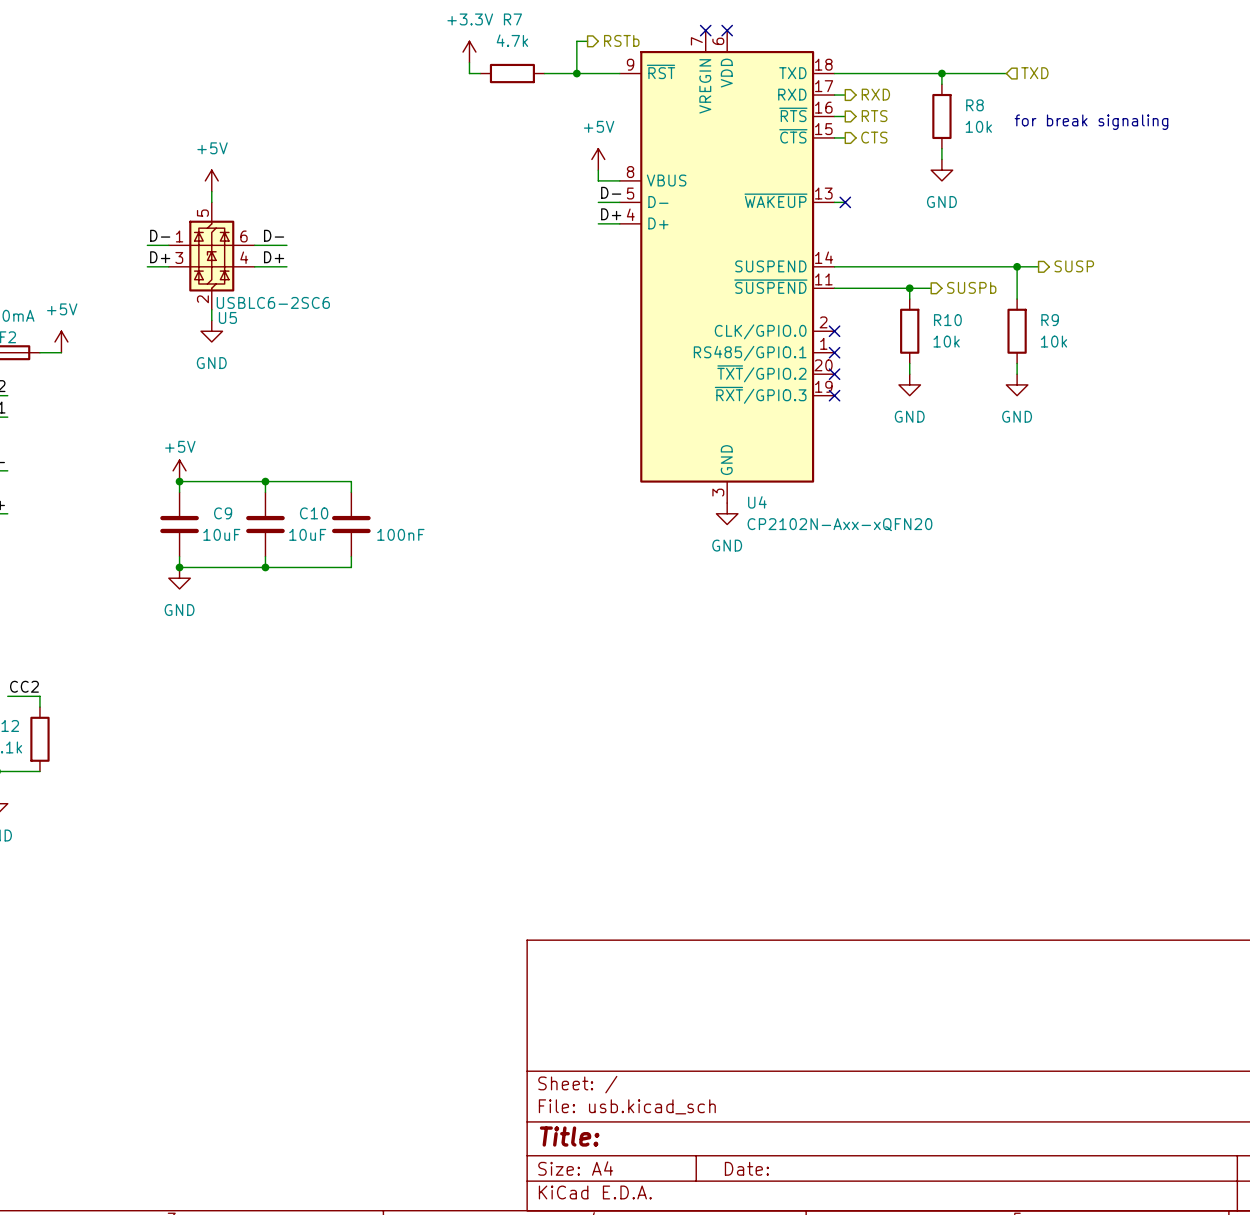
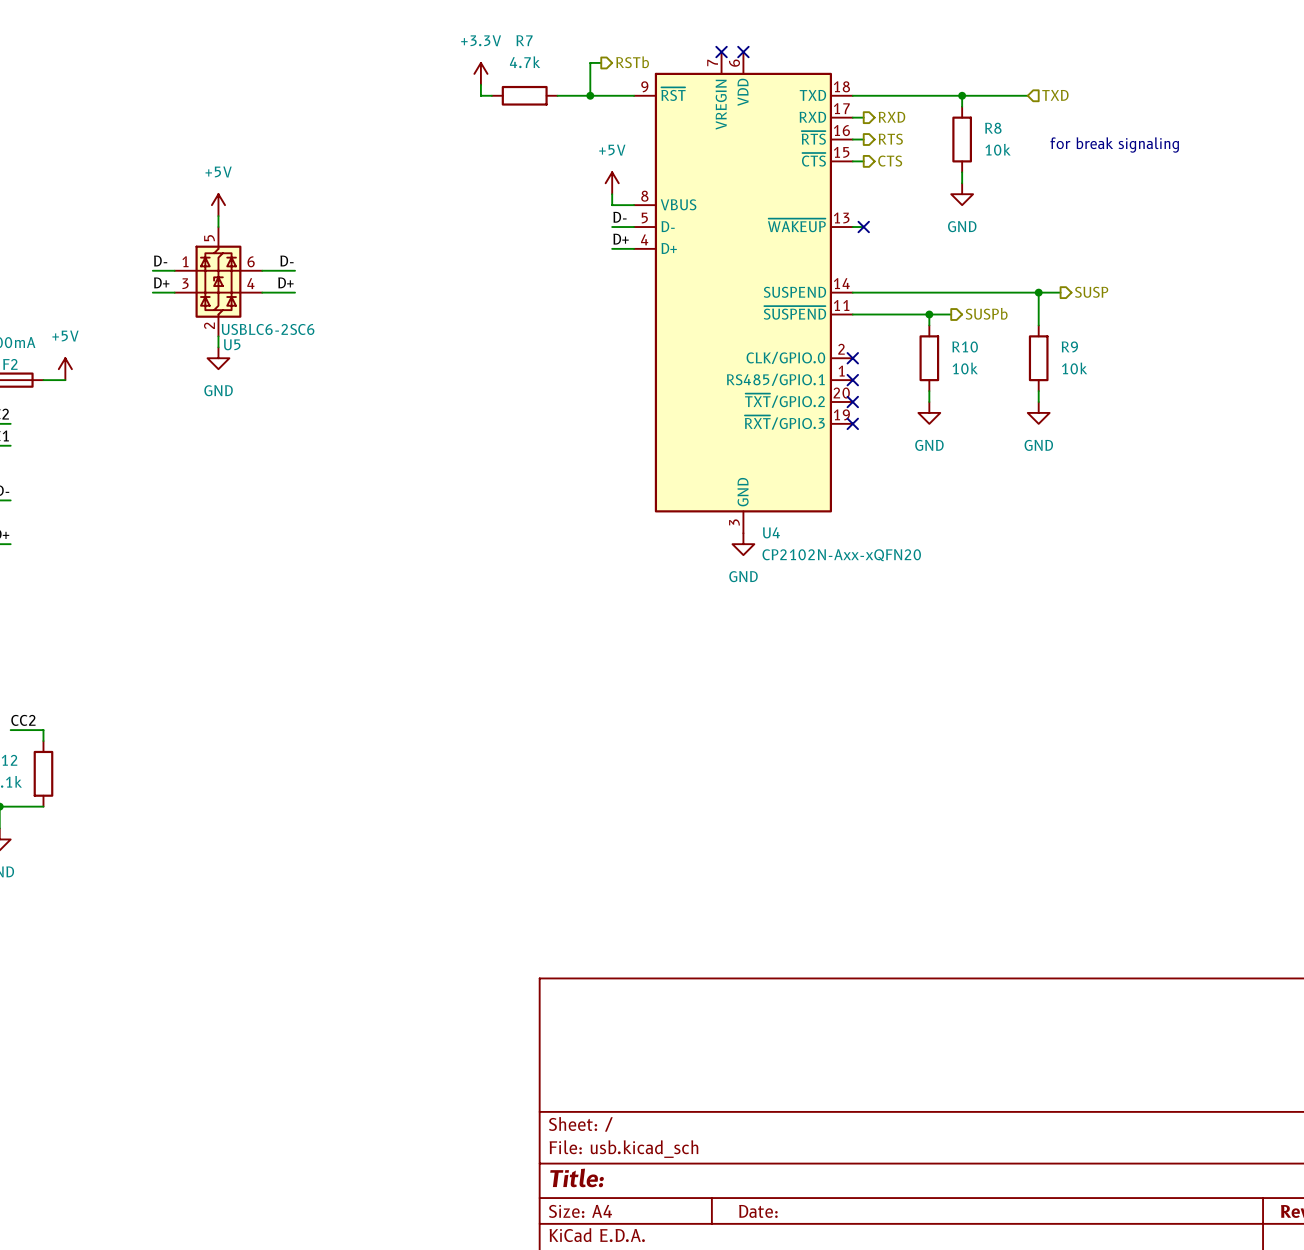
power symbol: +5V (179, 470) -> none
junction: (179, 481) -> none
wire: (265, 481) (265, 492) -> none
junction: (265, 481) -> none
wire: (179, 492) (179, 481) (351, 481) (351, 492) -> none
C9: 10uF (179, 524) -> none
C10: 10uF (265, 524) -> none
part: 100nF (351, 524) -> none
wire: (179, 556) (179, 567) (351, 567) (351, 556) -> none
wire: (265, 556) (265, 567) -> none
junction: (179, 567) -> none
junction: (265, 567) -> none
power symbol: GND (179, 578) -> none

